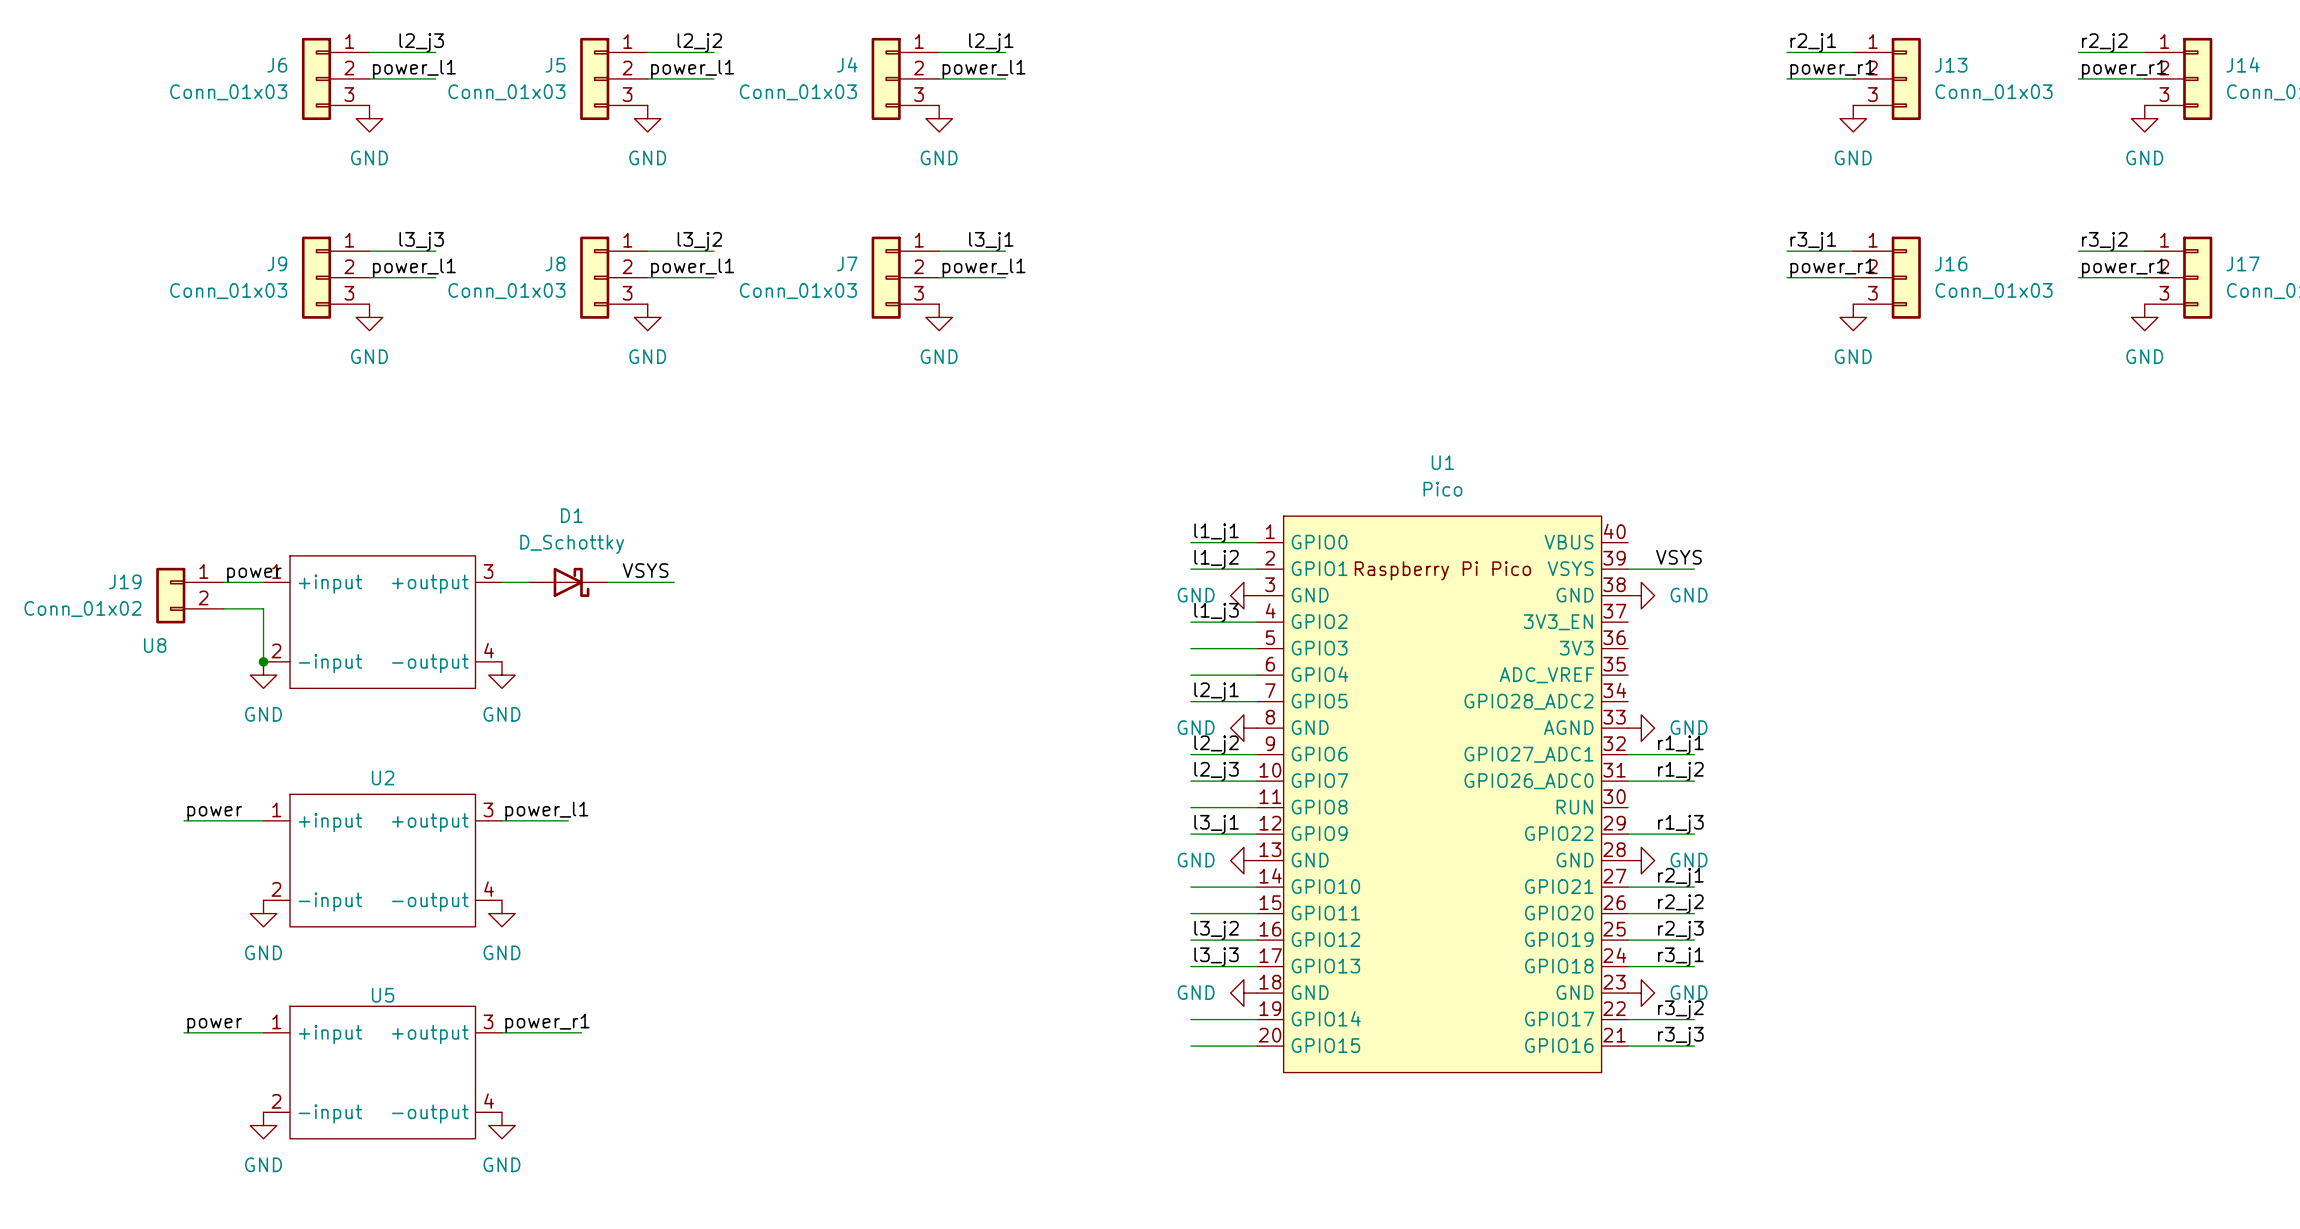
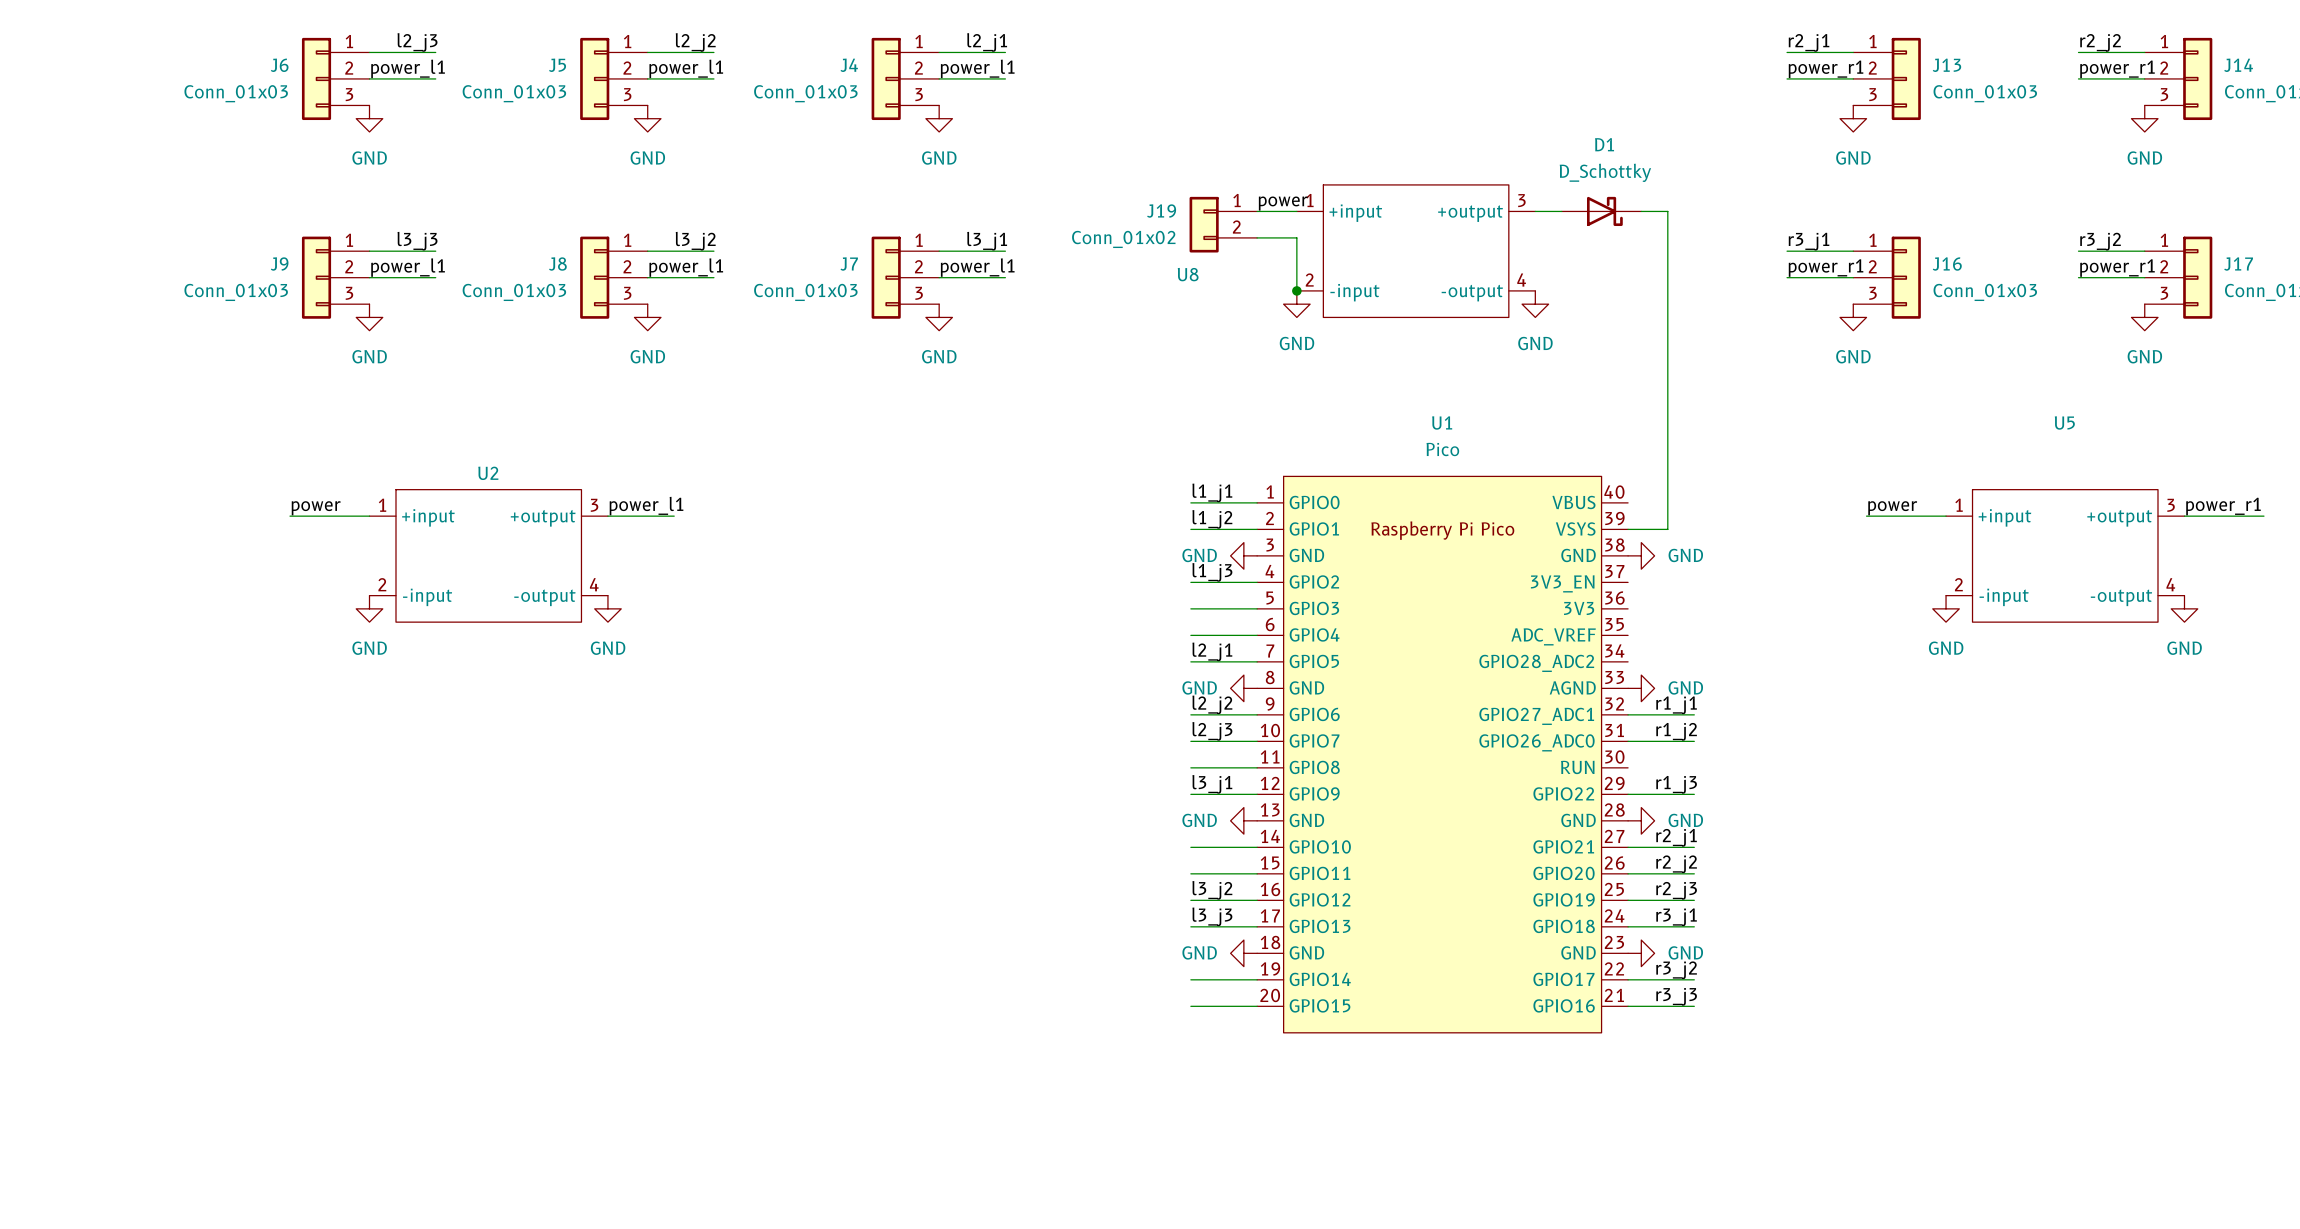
label: none -> power (1283, 203)
wire: none -> (1257, 211) (1296, 211)
wire: none -> (1535, 211) (1561, 211)
wire: none -> (1641, 211) (1667, 211) (1667, 529) (1628, 529)
wire: none -> (1257, 237) (1296, 237) (1296, 290)
junction: none -> (1296, 290)
power symbol: none -> GND (1296, 304)
power symbol: none -> GND (1535, 304)
label: none -> power_l1 (646, 506)
label: none -> power_r1 (2223, 506)
label: none -> power (1892, 508)
wire: none -> (290, 516) (369, 516)
wire: none -> (1866, 516) (1946, 516)
wire: none -> (2184, 516) (2263, 516)
label position: l1_j1 (1216, 533) -> l1_j1 (1212, 492)
wire: (1190, 542) (1257, 542) -> (1190, 502) (1257, 502)
label: VSYS (1678, 557) -> none
label position: l1_j2 (1216, 559) -> l1_j2 (1212, 519)
wire: (1190, 569) (1257, 569) -> (1190, 529) (1257, 529)
wire: (1628, 569) (1694, 569) -> none
label: VSYS (645, 570) -> none
label position: power (254, 574) -> power (316, 508)
wire: (223, 582) (263, 582) -> none
wire: (501, 582) (528, 582) -> none
D1 position: (568, 582) -> (1601, 211)
wire: (607, 582) (674, 582) -> (607, 516) (674, 516)
J19 position: (189, 595) -> (1223, 224)
power symbol position: GND (1243, 595) -> GND (1243, 555)
power symbol position: GND (1641, 595) -> GND (1641, 555)
wire: (223, 608) (263, 608) (263, 661) -> none
power symbol: none -> GND (369, 608)
power symbol: none -> GND (607, 608)
power symbol: none -> GND (1946, 608)
power symbol: none -> GND (2184, 608)
label position: l1_j3 (1216, 612) -> l1_j3 (1212, 572)
U8 position: (382, 622) -> (1416, 251)
wire: (1190, 622) (1257, 622) -> (1190, 582) (1257, 582)
wire: (1190, 648) (1257, 648) -> (1190, 608) (1257, 608)
junction: (263, 661) -> none
power symbol: GND (263, 675) -> none
power symbol: GND (501, 675) -> none
wire: (1190, 675) (1257, 675) -> (1190, 635) (1257, 635)
label position: l2_j1 (1216, 692) -> l2_j1 (1212, 651)
wire: (1190, 701) (1257, 701) -> (1190, 661) (1257, 661)
power symbol position: GND (1243, 728) -> GND (1243, 688)
power symbol position: GND (1641, 728) -> GND (1641, 688)
label position: l2_j2 (1216, 745) -> l2_j2 (1212, 704)
label position: r1_j1 (1680, 745) -> r1_j1 (1676, 705)
wire: (1190, 754) (1257, 754) -> (1190, 714) (1257, 714)
wire: (1628, 754) (1694, 754) -> (1628, 714) (1694, 714)
label position: l2_j3 (1216, 771) -> l2_j3 (1212, 731)
label position: r1_j2 (1680, 771) -> r1_j2 (1676, 731)
wire: (1190, 781) (1257, 781) -> (1190, 741) (1257, 741)
wire: (1628, 781) (1694, 781) -> (1628, 741) (1694, 741)
U1 position: (1442, 794) -> (1442, 754)
wire: (1190, 807) (1257, 807) -> (1190, 767) (1257, 767)
label: power_l1 (546, 811) -> none
label: power (214, 813) -> none
wire: (184, 820) (263, 820) -> none
wire: (501, 820) (568, 820) -> none
label position: l3_j1 (1216, 824) -> l3_j1 (1212, 784)
label position: r1_j3 (1680, 824) -> r1_j3 (1676, 784)
wire: (1190, 834) (1257, 834) -> (1190, 794) (1257, 794)
wire: (1628, 834) (1694, 834) -> (1628, 794) (1694, 794)
U2 position: (382, 860) -> (488, 555)
power symbol position: GND (1243, 860) -> GND (1243, 820)
power symbol position: GND (1641, 860) -> GND (1641, 820)
label position: r2_j1 (1680, 877) -> r2_j1 (1676, 837)
wire: (1190, 887) (1257, 887) -> (1190, 847) (1257, 847)
wire: (1628, 887) (1694, 887) -> (1628, 847) (1694, 847)
label position: r2_j2 (1680, 903) -> r2_j2 (1676, 864)
power symbol: GND (263, 913) -> none
power symbol: GND (501, 913) -> none
wire: (1190, 913) (1257, 913) -> (1190, 873) (1257, 873)
wire: (1628, 913) (1694, 913) -> (1628, 873) (1694, 873)
label position: l3_j2 (1216, 930) -> l3_j2 (1212, 890)
label position: r2_j3 (1680, 930) -> r2_j3 (1676, 890)
wire: (1190, 940) (1257, 940) -> (1190, 900) (1257, 900)
wire: (1628, 940) (1694, 940) -> (1628, 900) (1694, 900)
label position: l3_j3 (1216, 956) -> l3_j3 (1212, 916)
label position: r3_j1 (1680, 956) -> r3_j1 (1676, 917)
wire: (1190, 966) (1257, 966) -> (1190, 926) (1257, 926)
wire: (1628, 966) (1694, 966) -> (1628, 926) (1694, 926)
power symbol position: GND (1243, 993) -> GND (1243, 953)
power symbol position: GND (1641, 993) -> GND (1641, 953)
U5 name position: U5 (383, 995) -> U5 (2064, 422)
label position: r3_j2 (1680, 1009) -> r3_j2 (1676, 970)
wire: (1190, 1019) (1257, 1019) -> (1190, 979) (1257, 979)
wire: (1628, 1019) (1694, 1019) -> (1628, 979) (1694, 979)
label: power_r1 (547, 1023) -> none
label: power (214, 1025) -> none
wire: (184, 1032) (263, 1032) -> none
wire: (501, 1032) (581, 1032) -> none
label position: r3_j3 (1680, 1036) -> r3_j3 (1676, 996)
wire: (1190, 1046) (1257, 1046) -> (1190, 1006) (1257, 1006)
wire: (1628, 1046) (1694, 1046) -> (1628, 1006) (1694, 1006)
U5 position: (382, 1072) -> (2065, 555)
power symbol: GND (263, 1125) -> none
power symbol: GND (501, 1125) -> none

